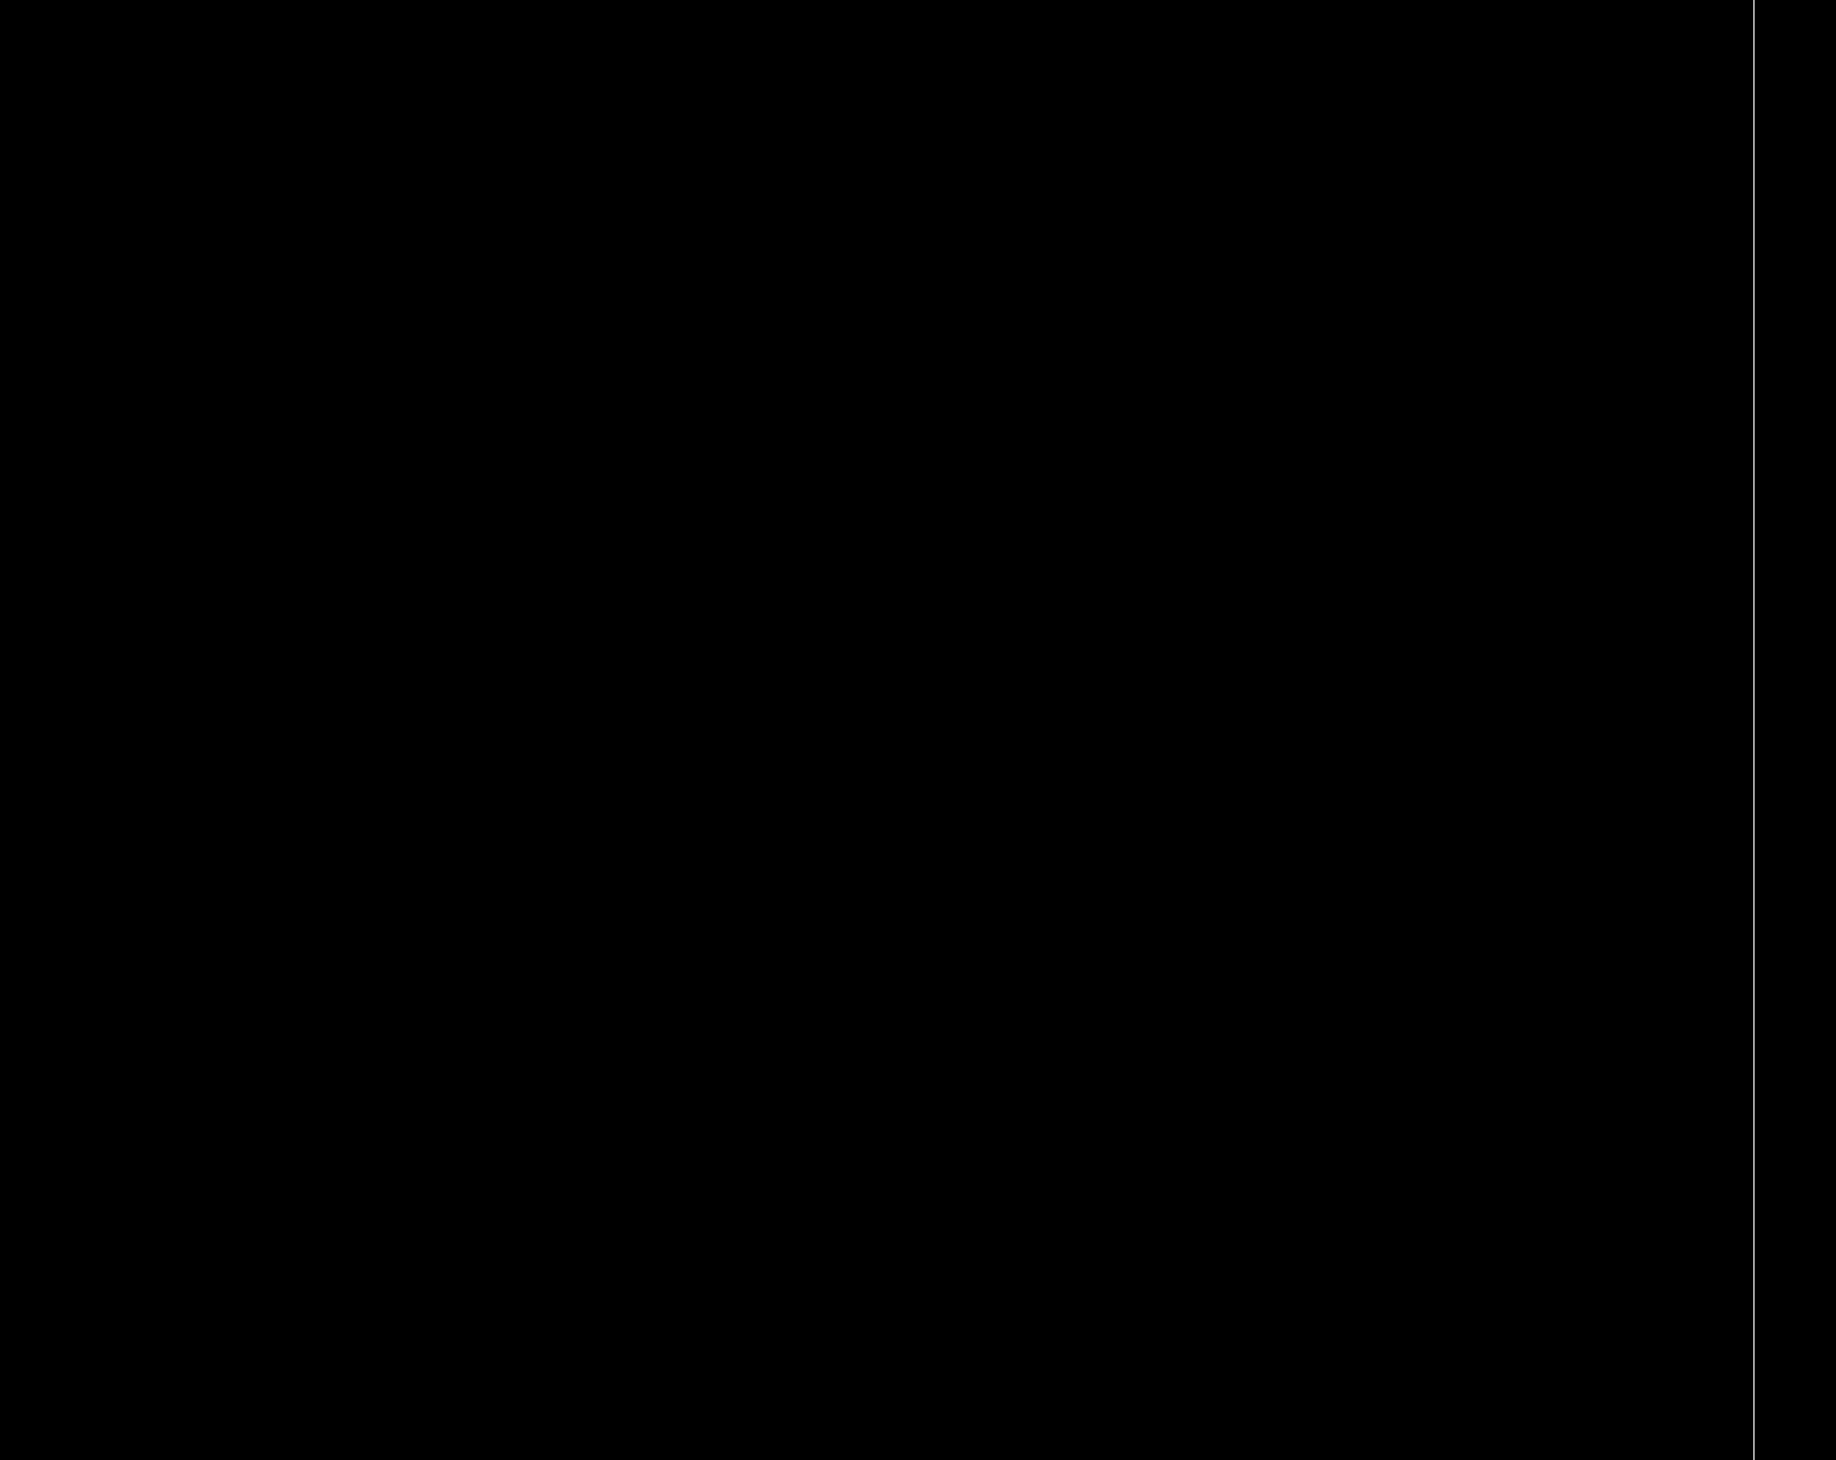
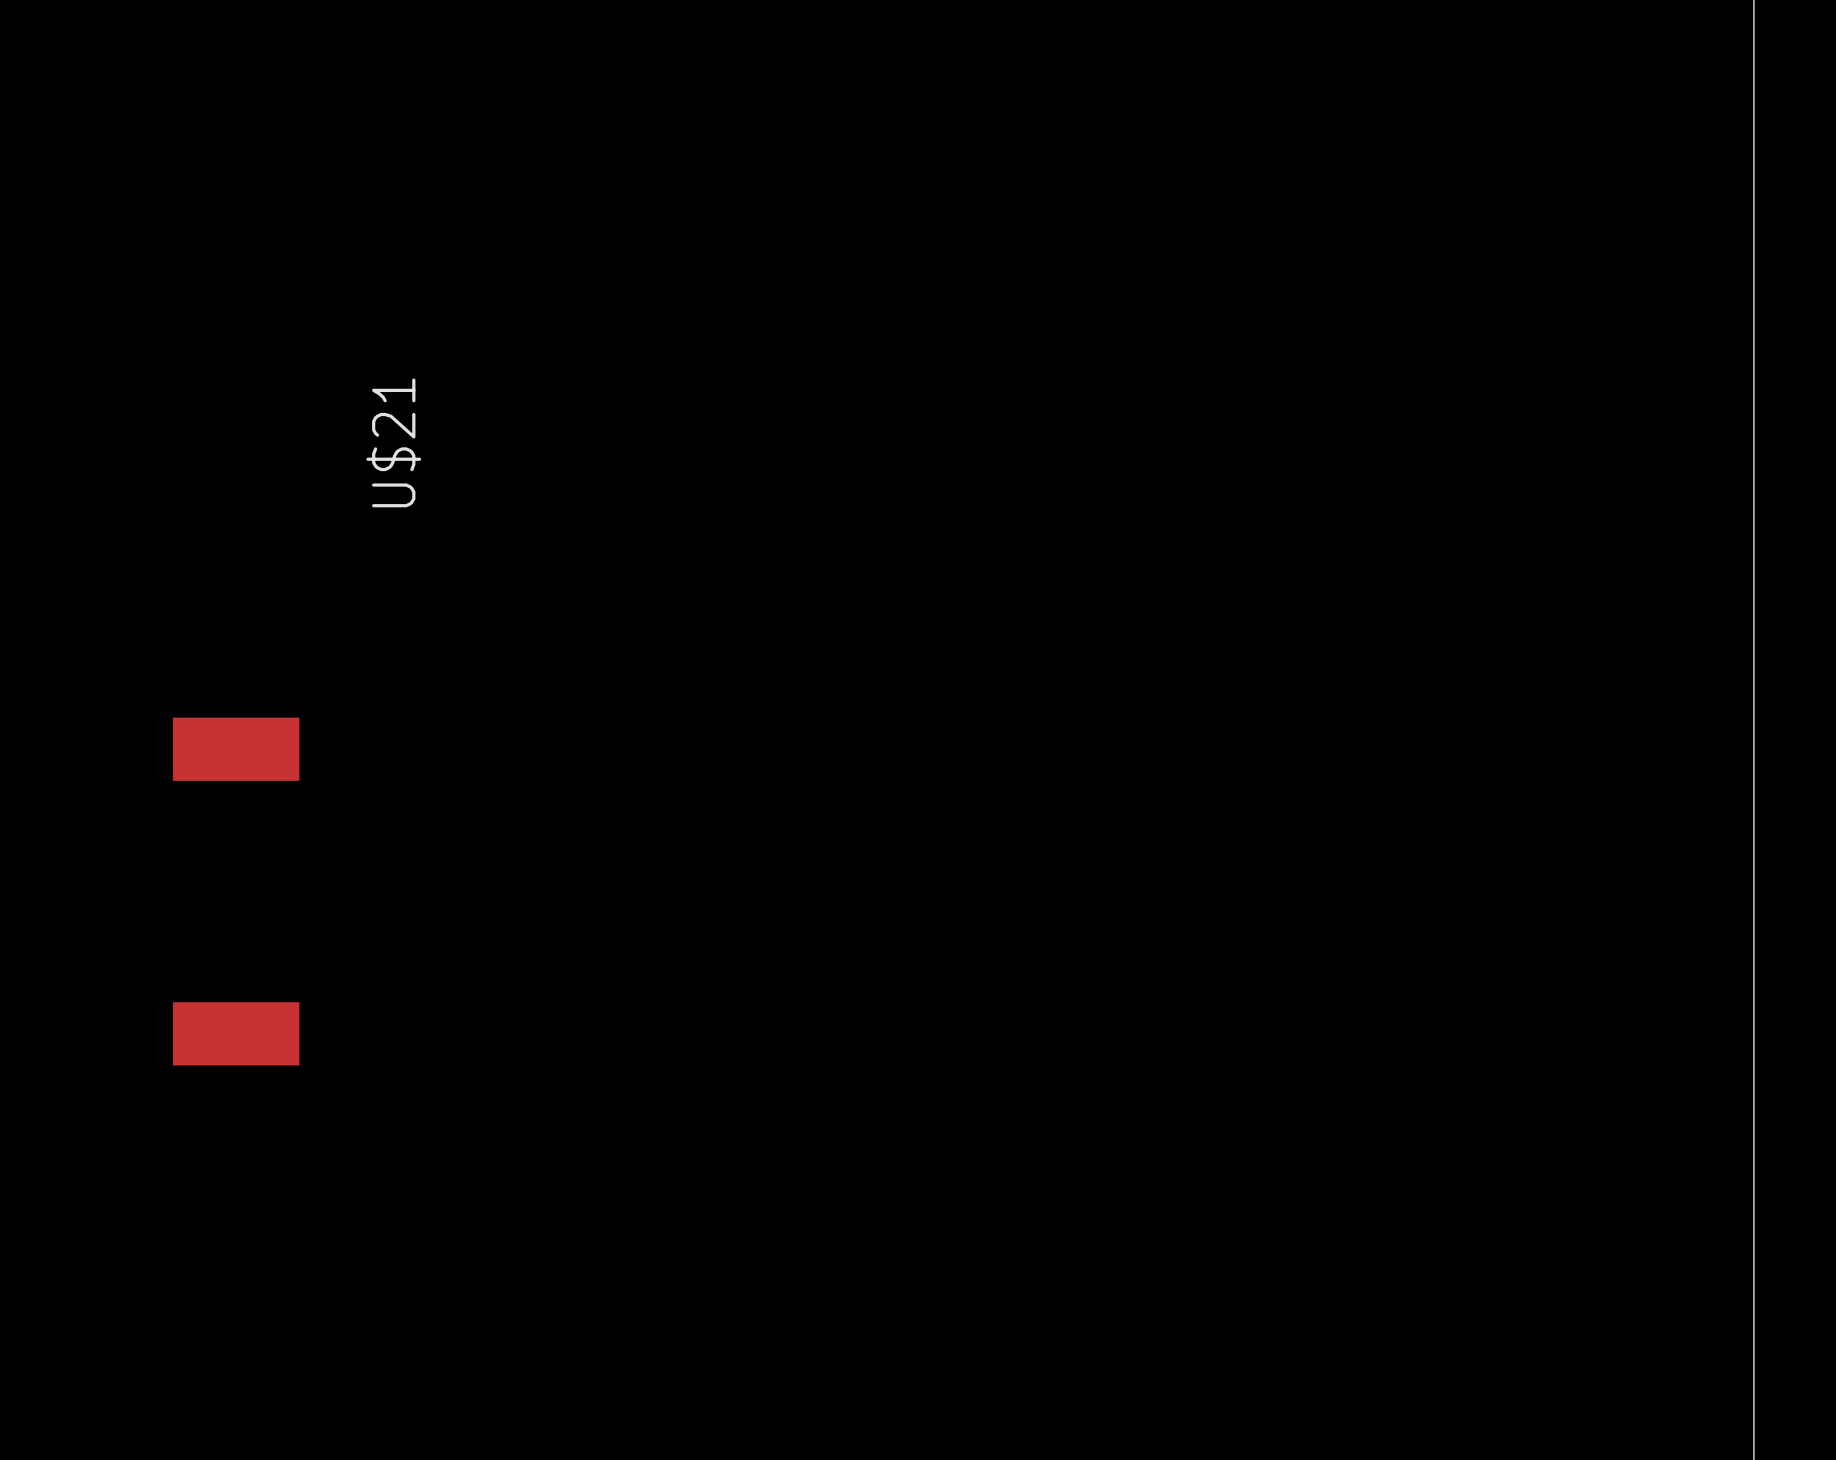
U$21: none -> (236, 891)

